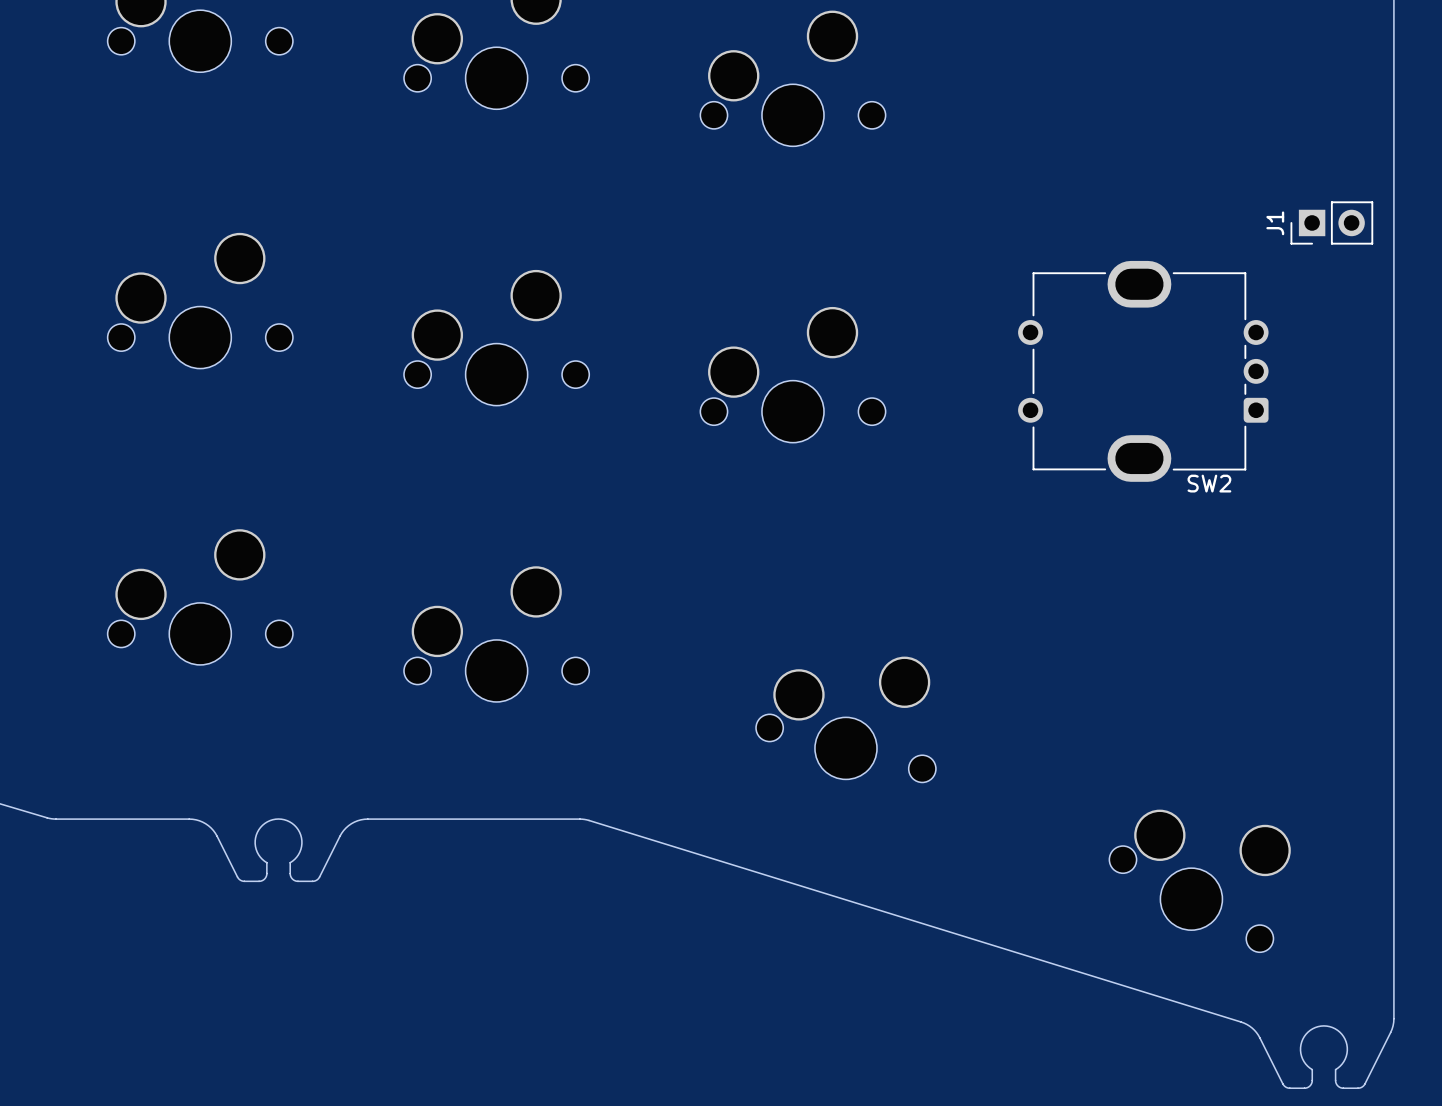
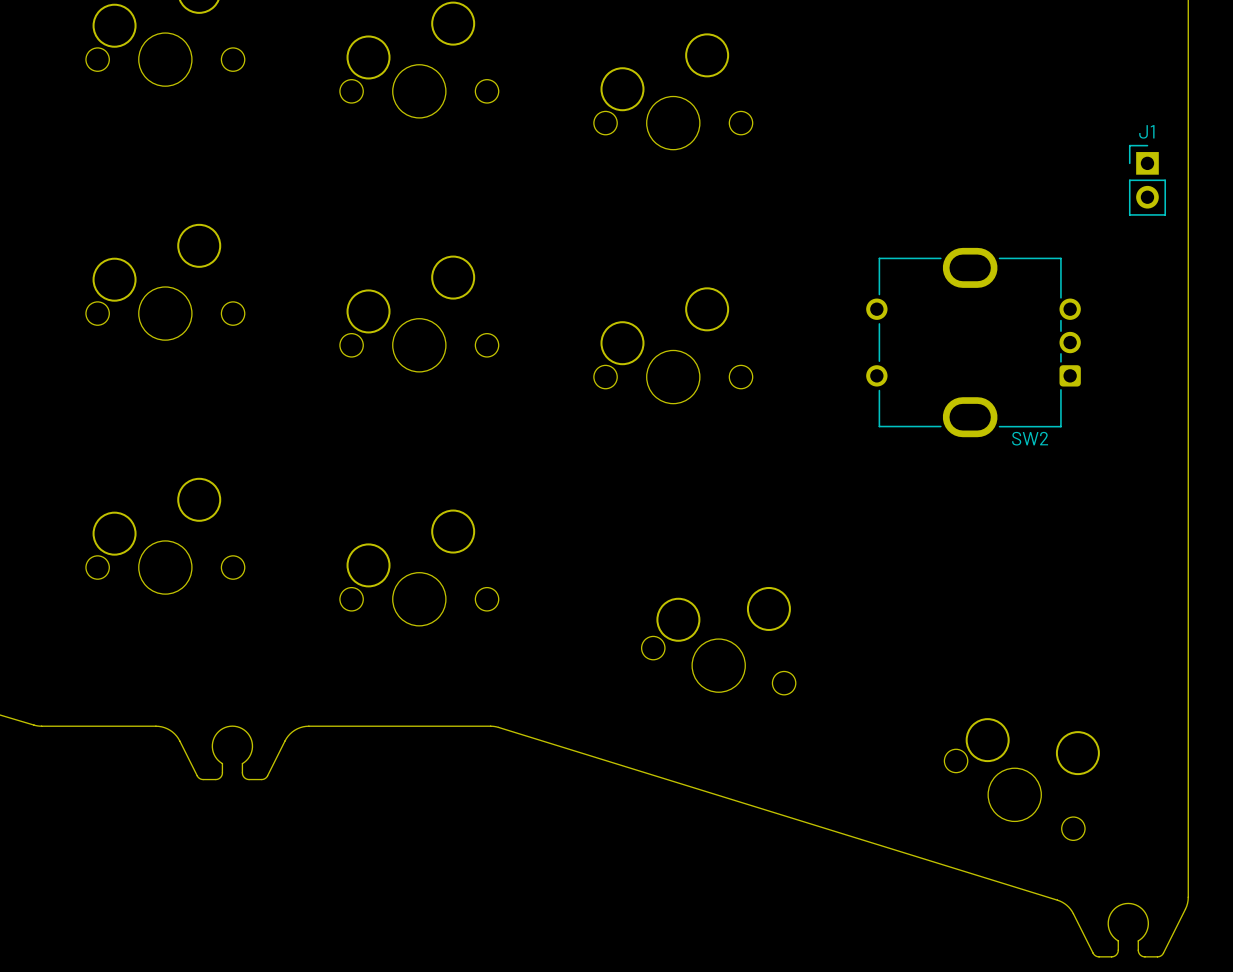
J1 rotation: 0° (1331, 222) -> 90° clockwise (1147, 180)

